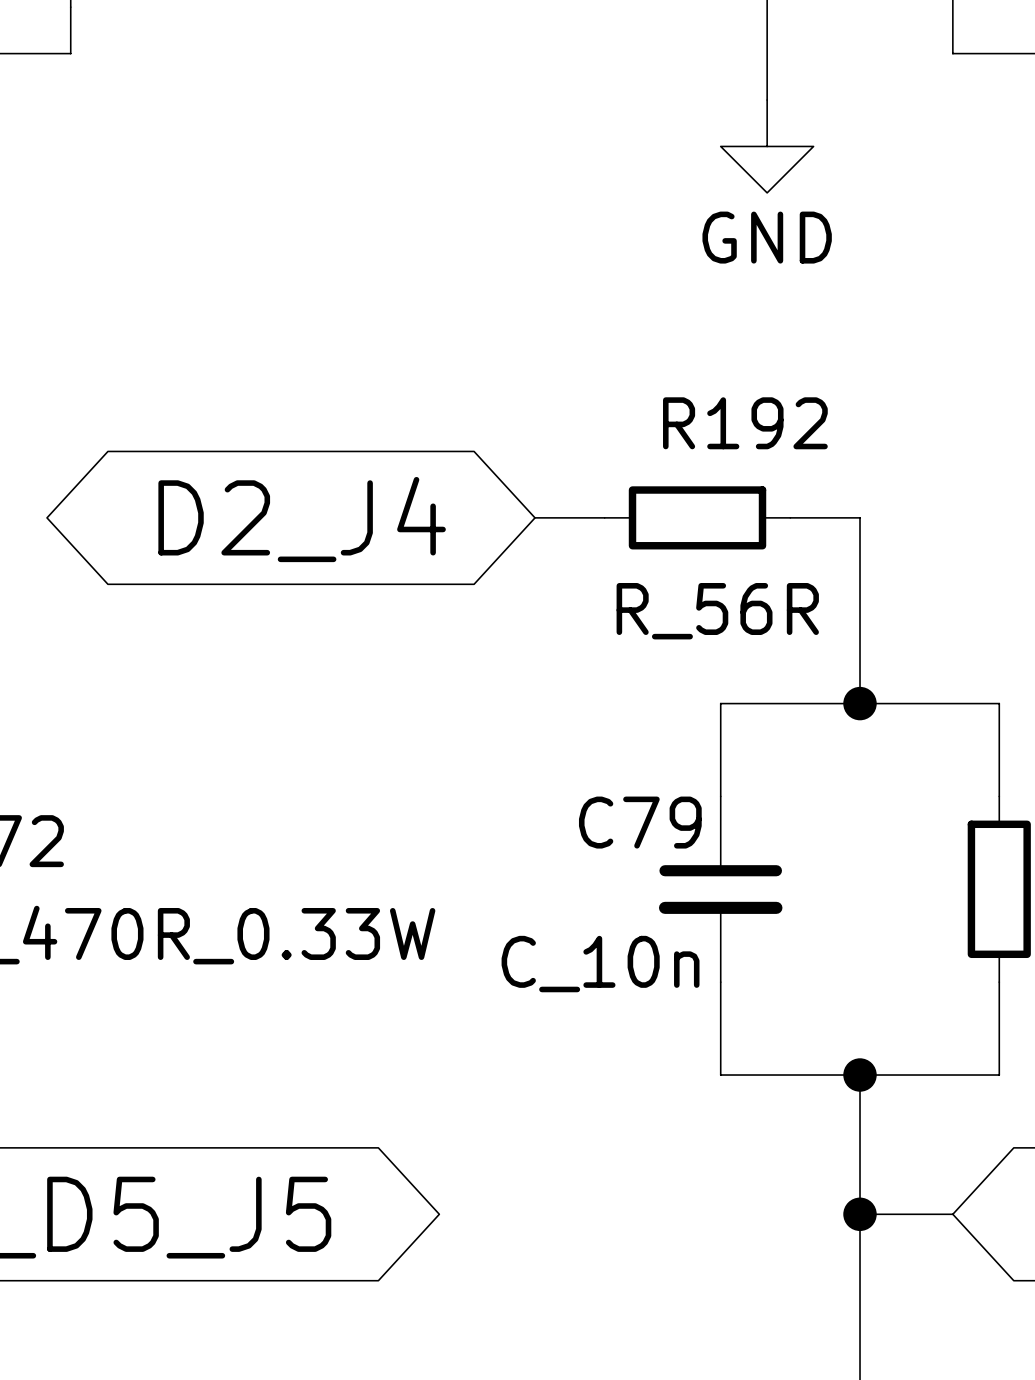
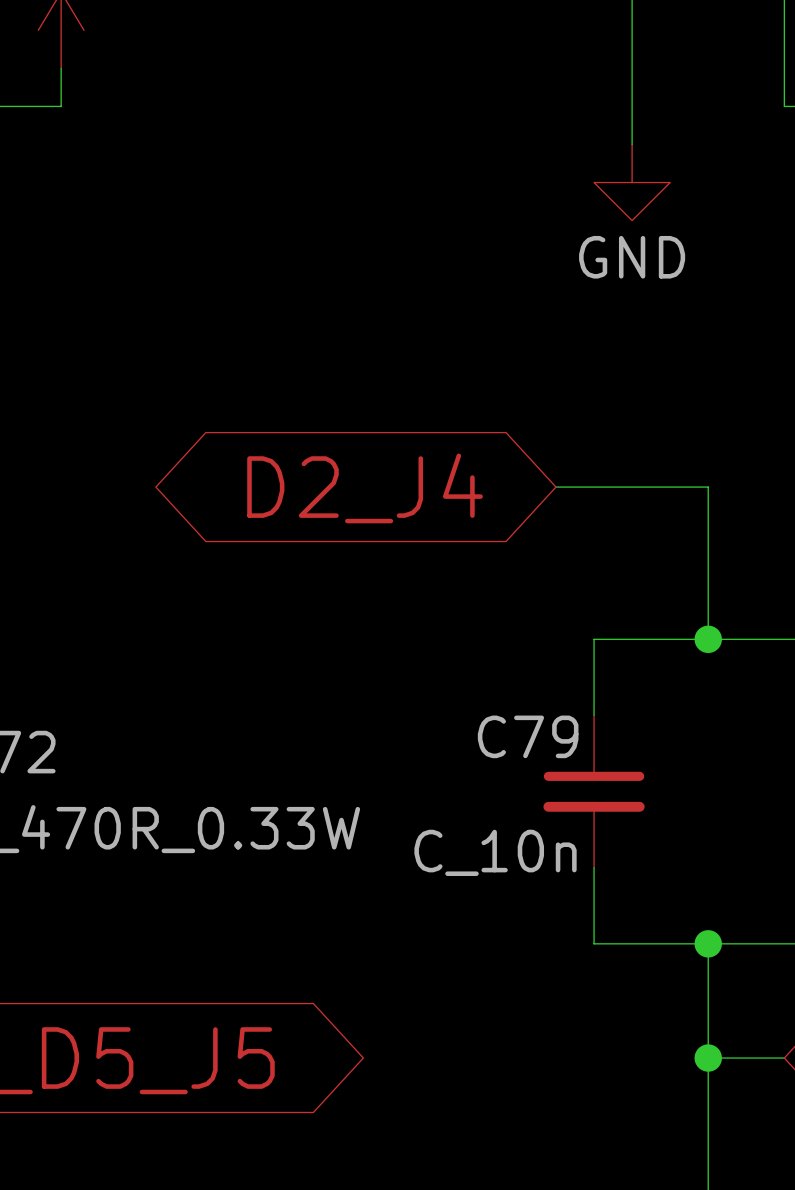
wire: (535, 517) (604, 517) -> none
wire: none -> (555, 487) (651, 487)
R192: R_56R (697, 517) -> none
global label position: D2_J4 (302, 519) -> D2_J4 (365, 488)

